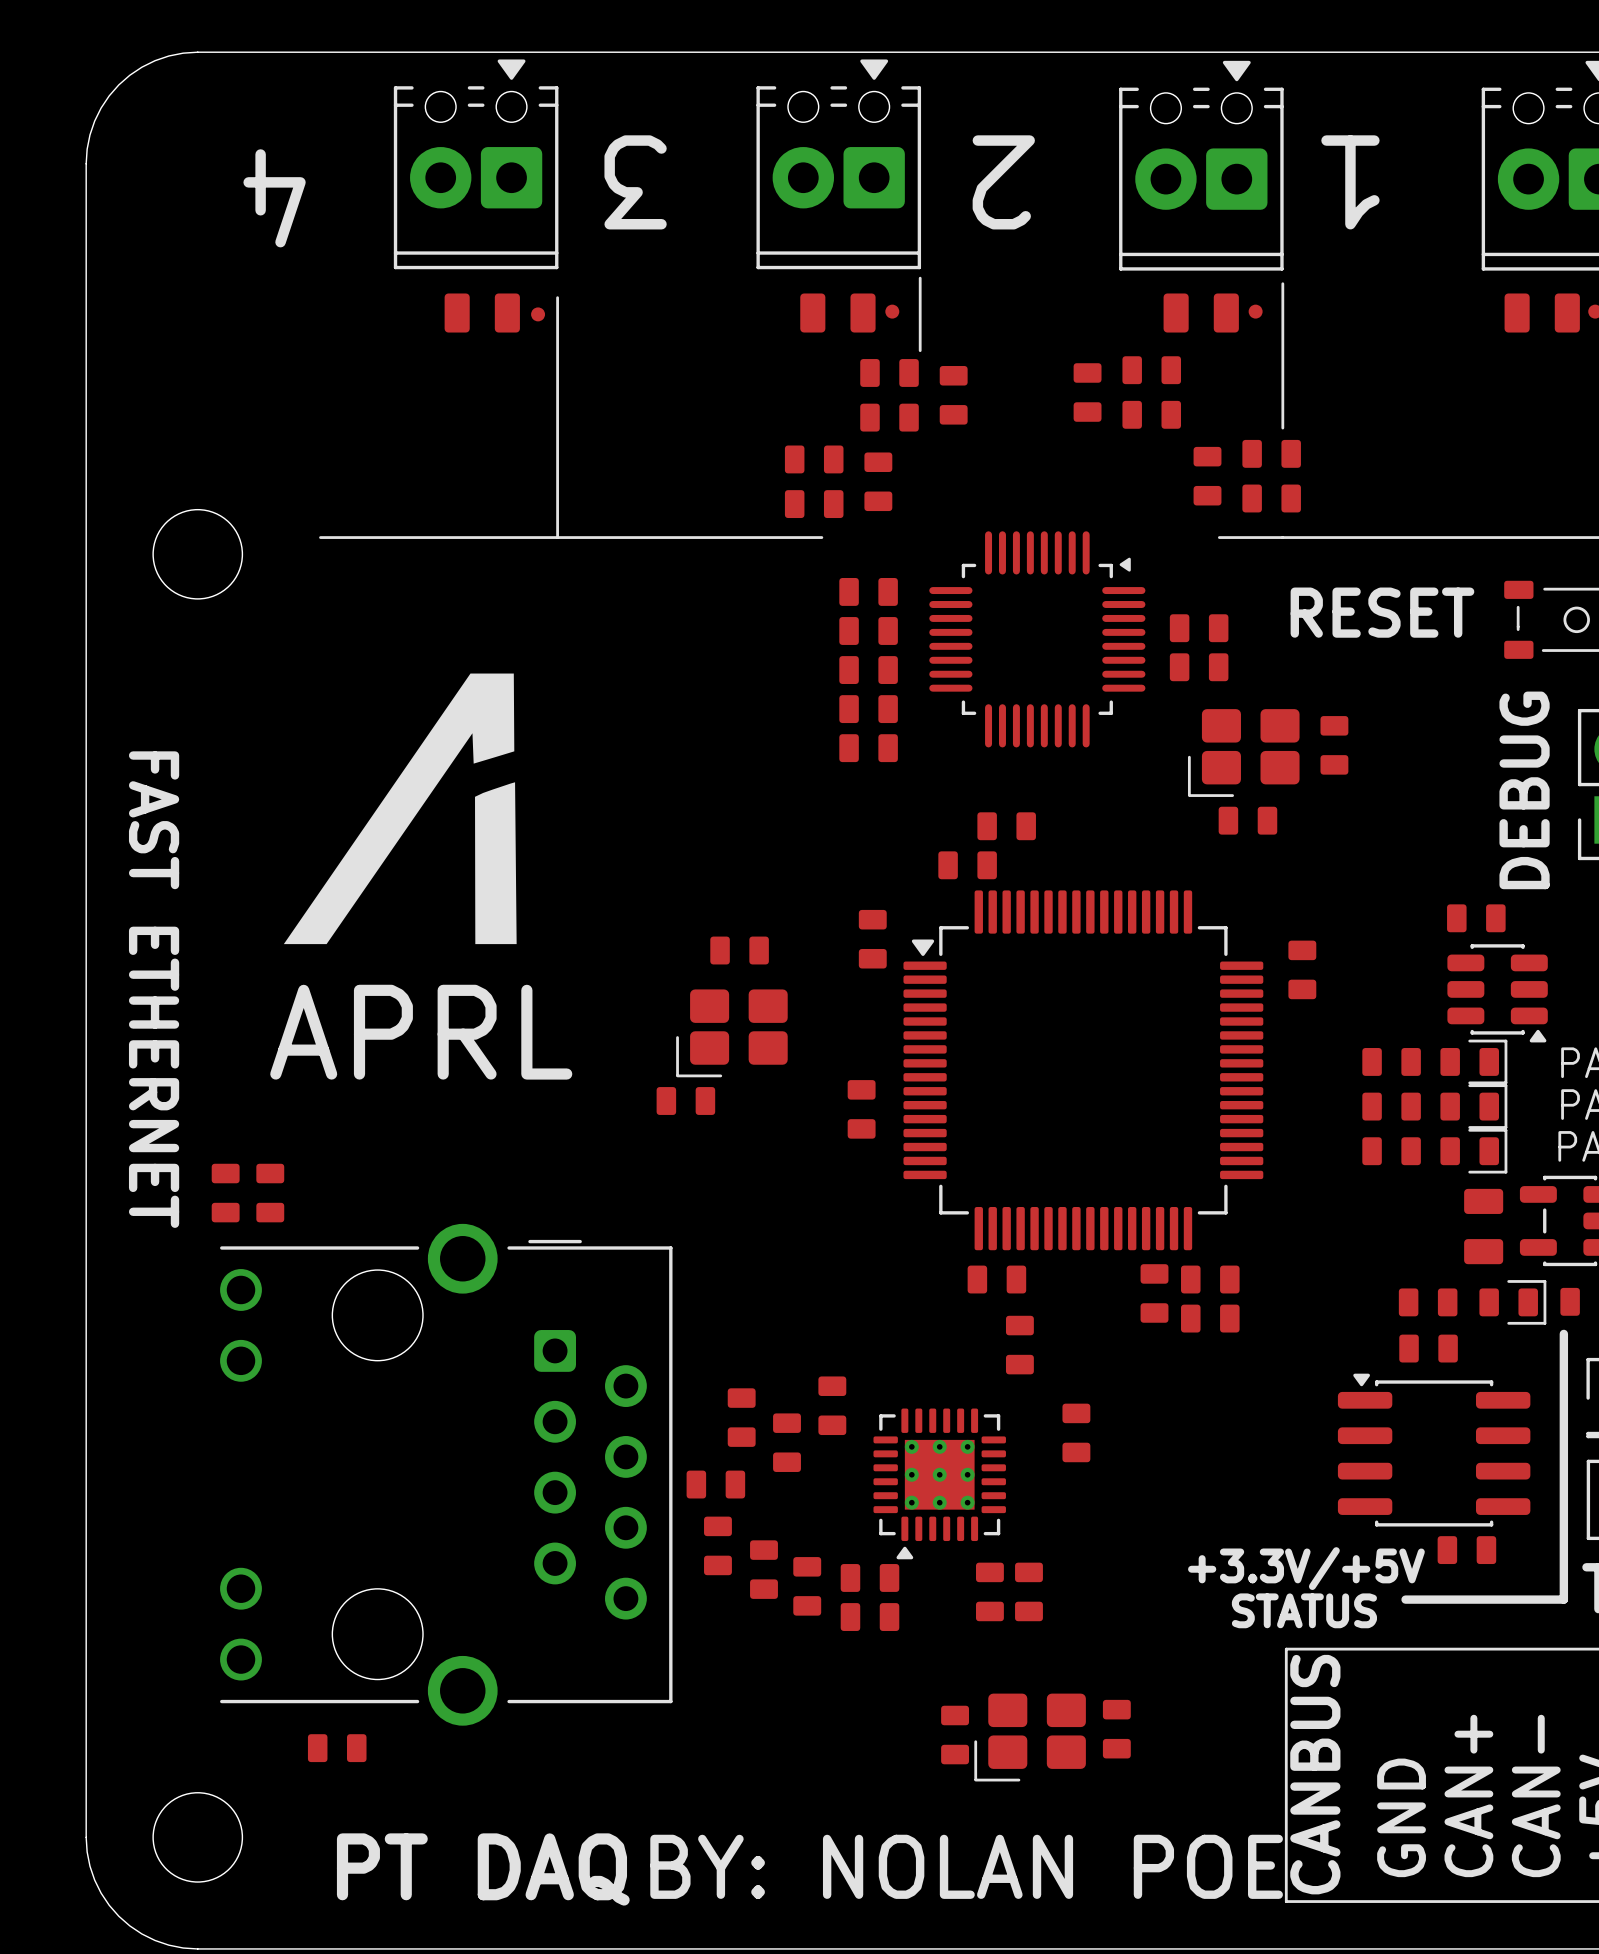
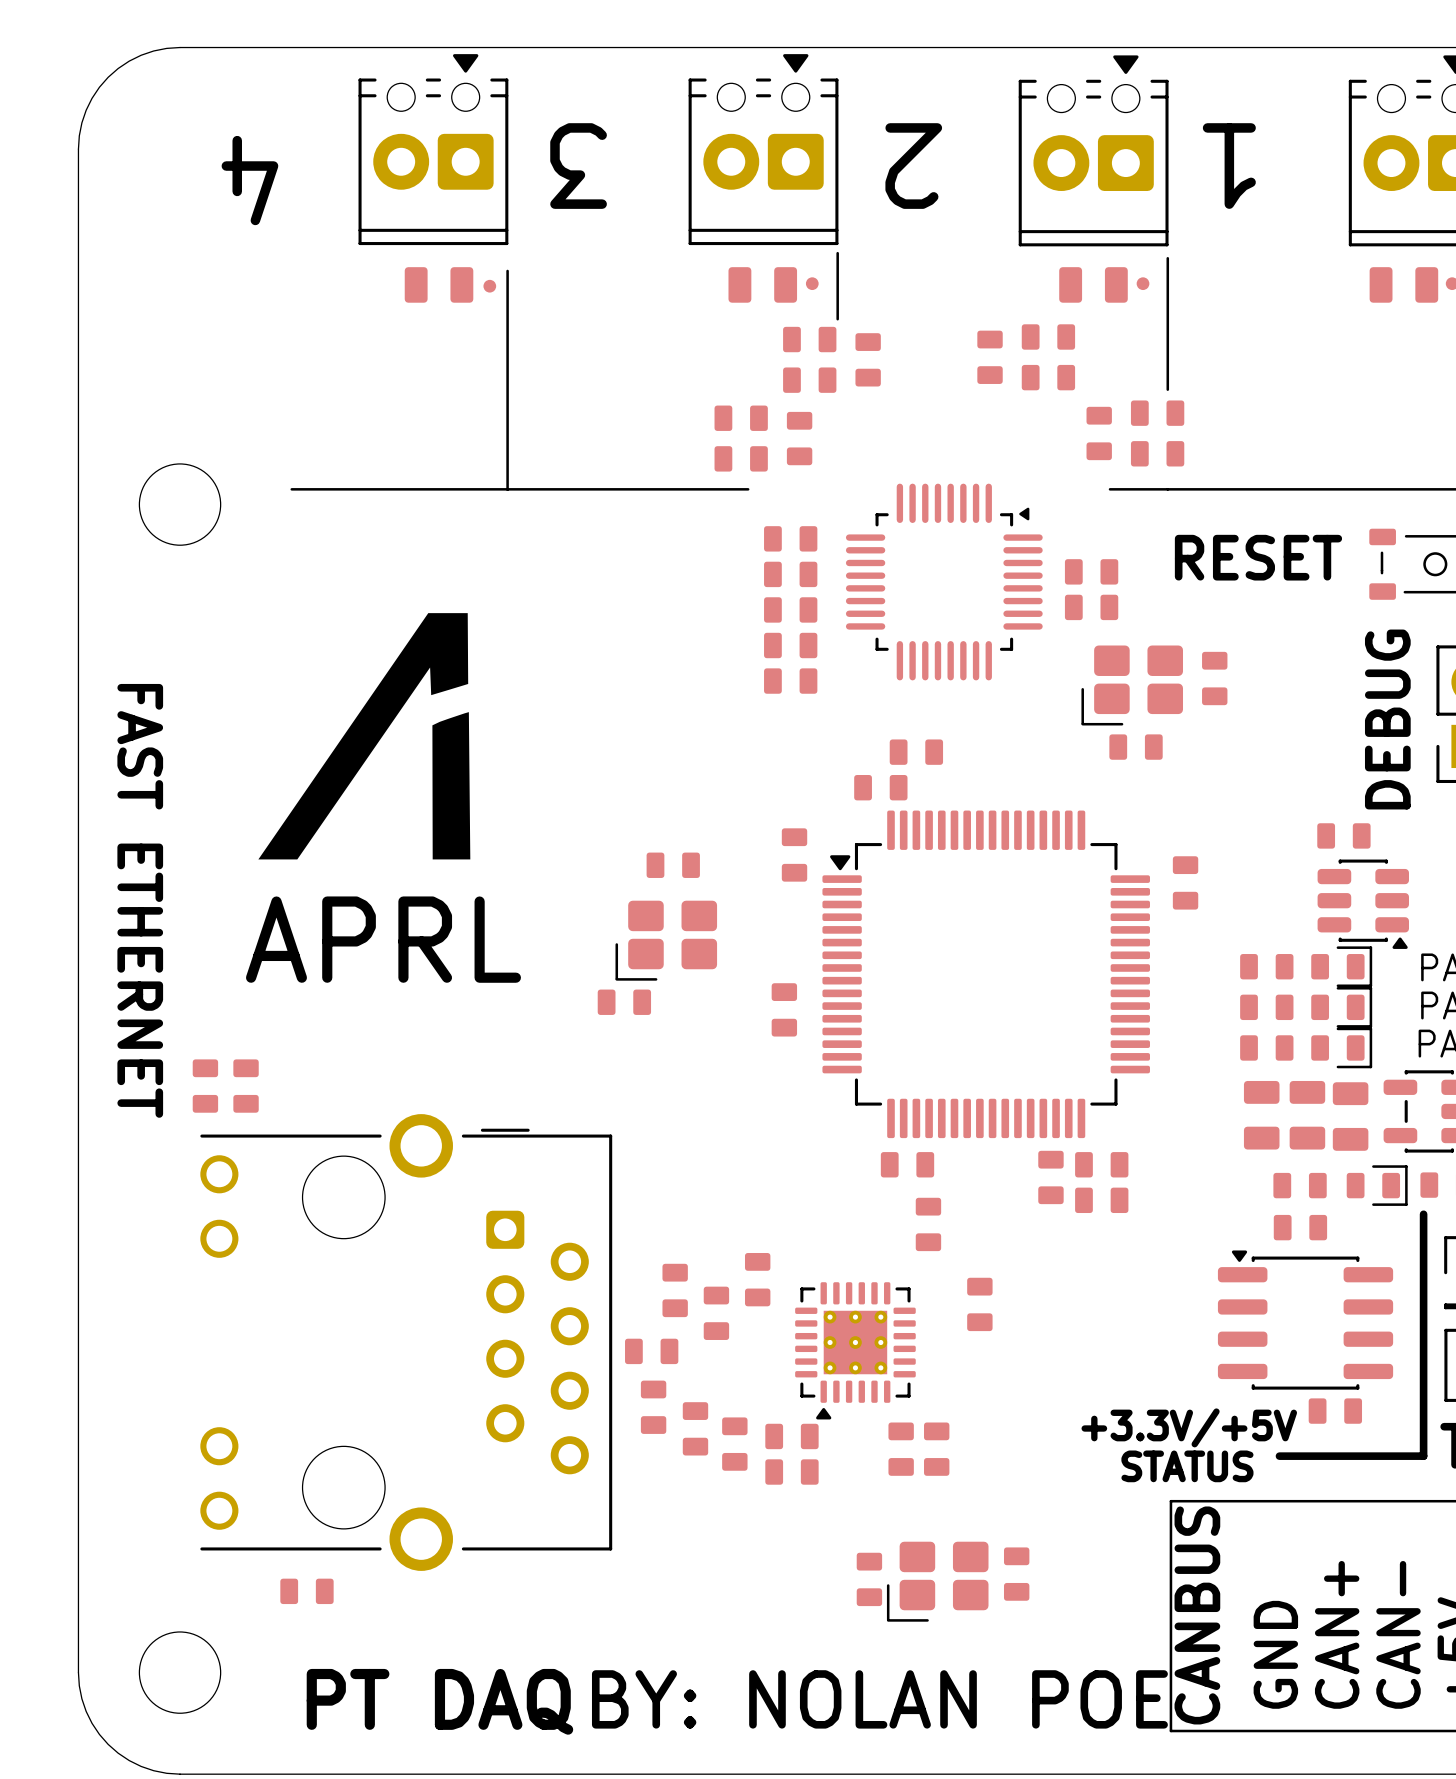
part: none -> (1261, 1115)
part: none -> (1307, 1115)

